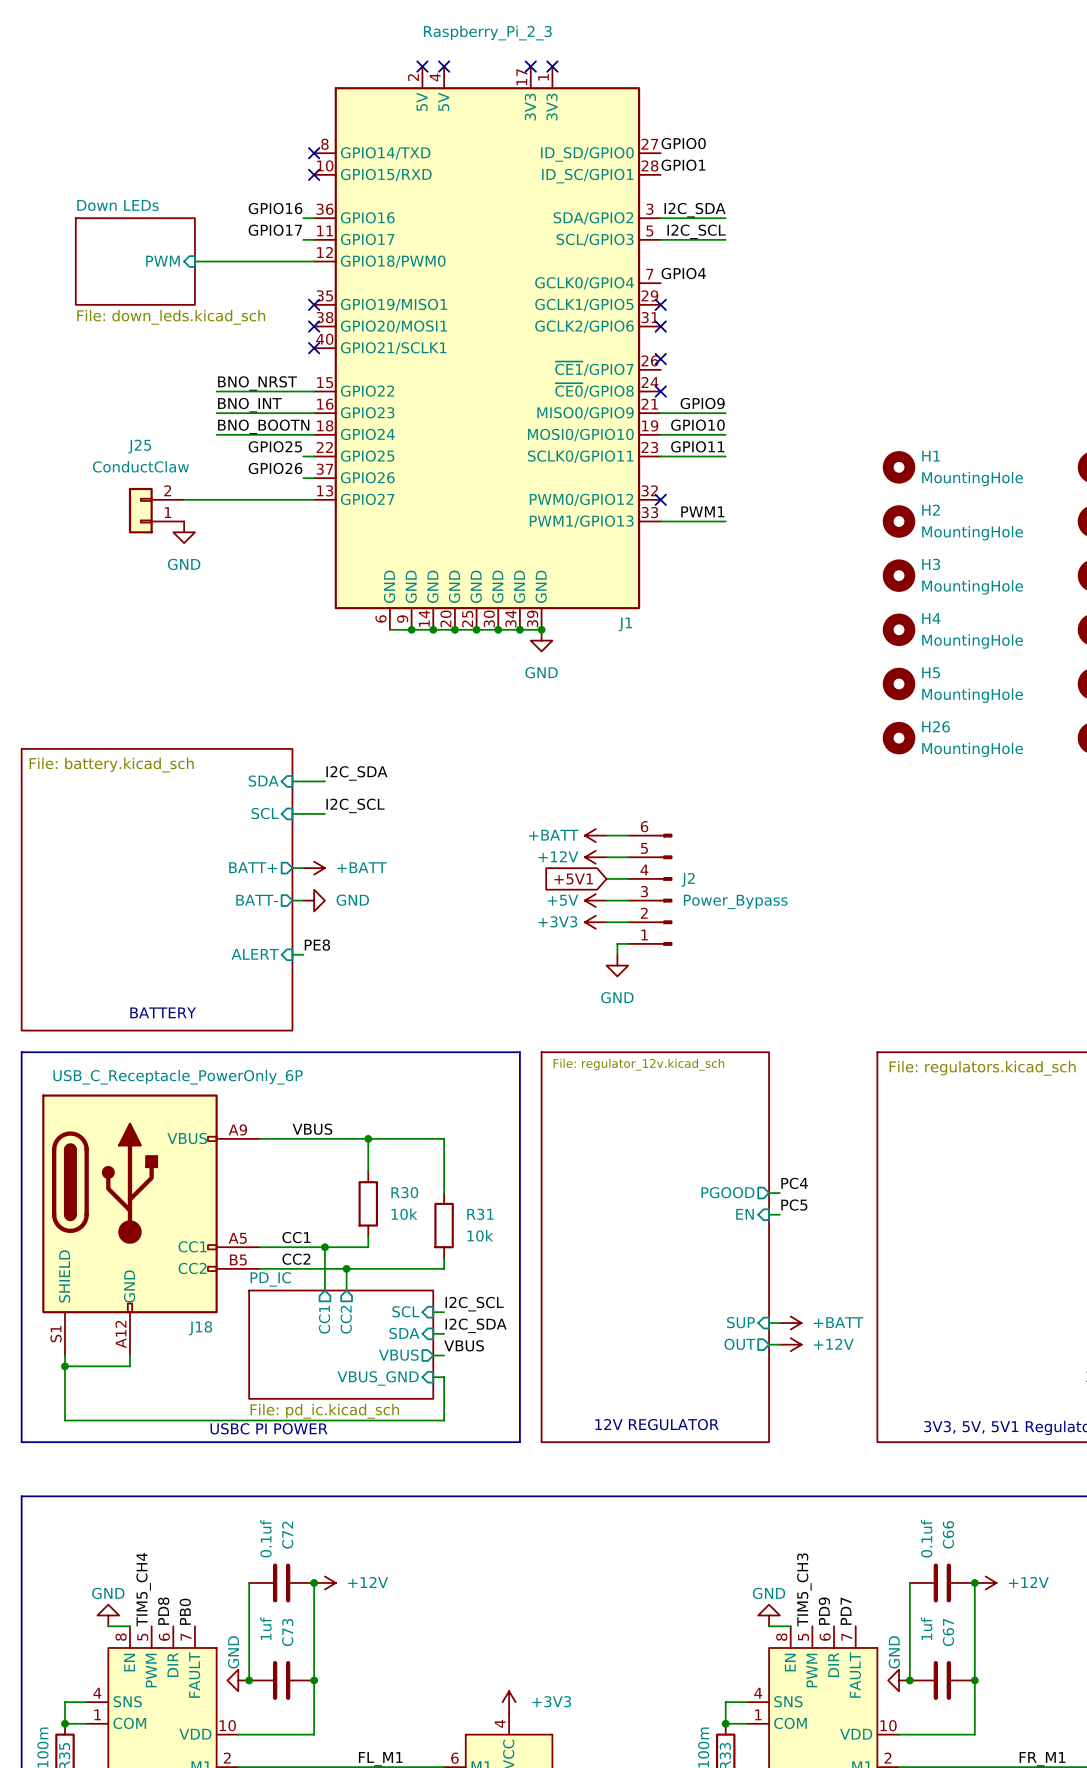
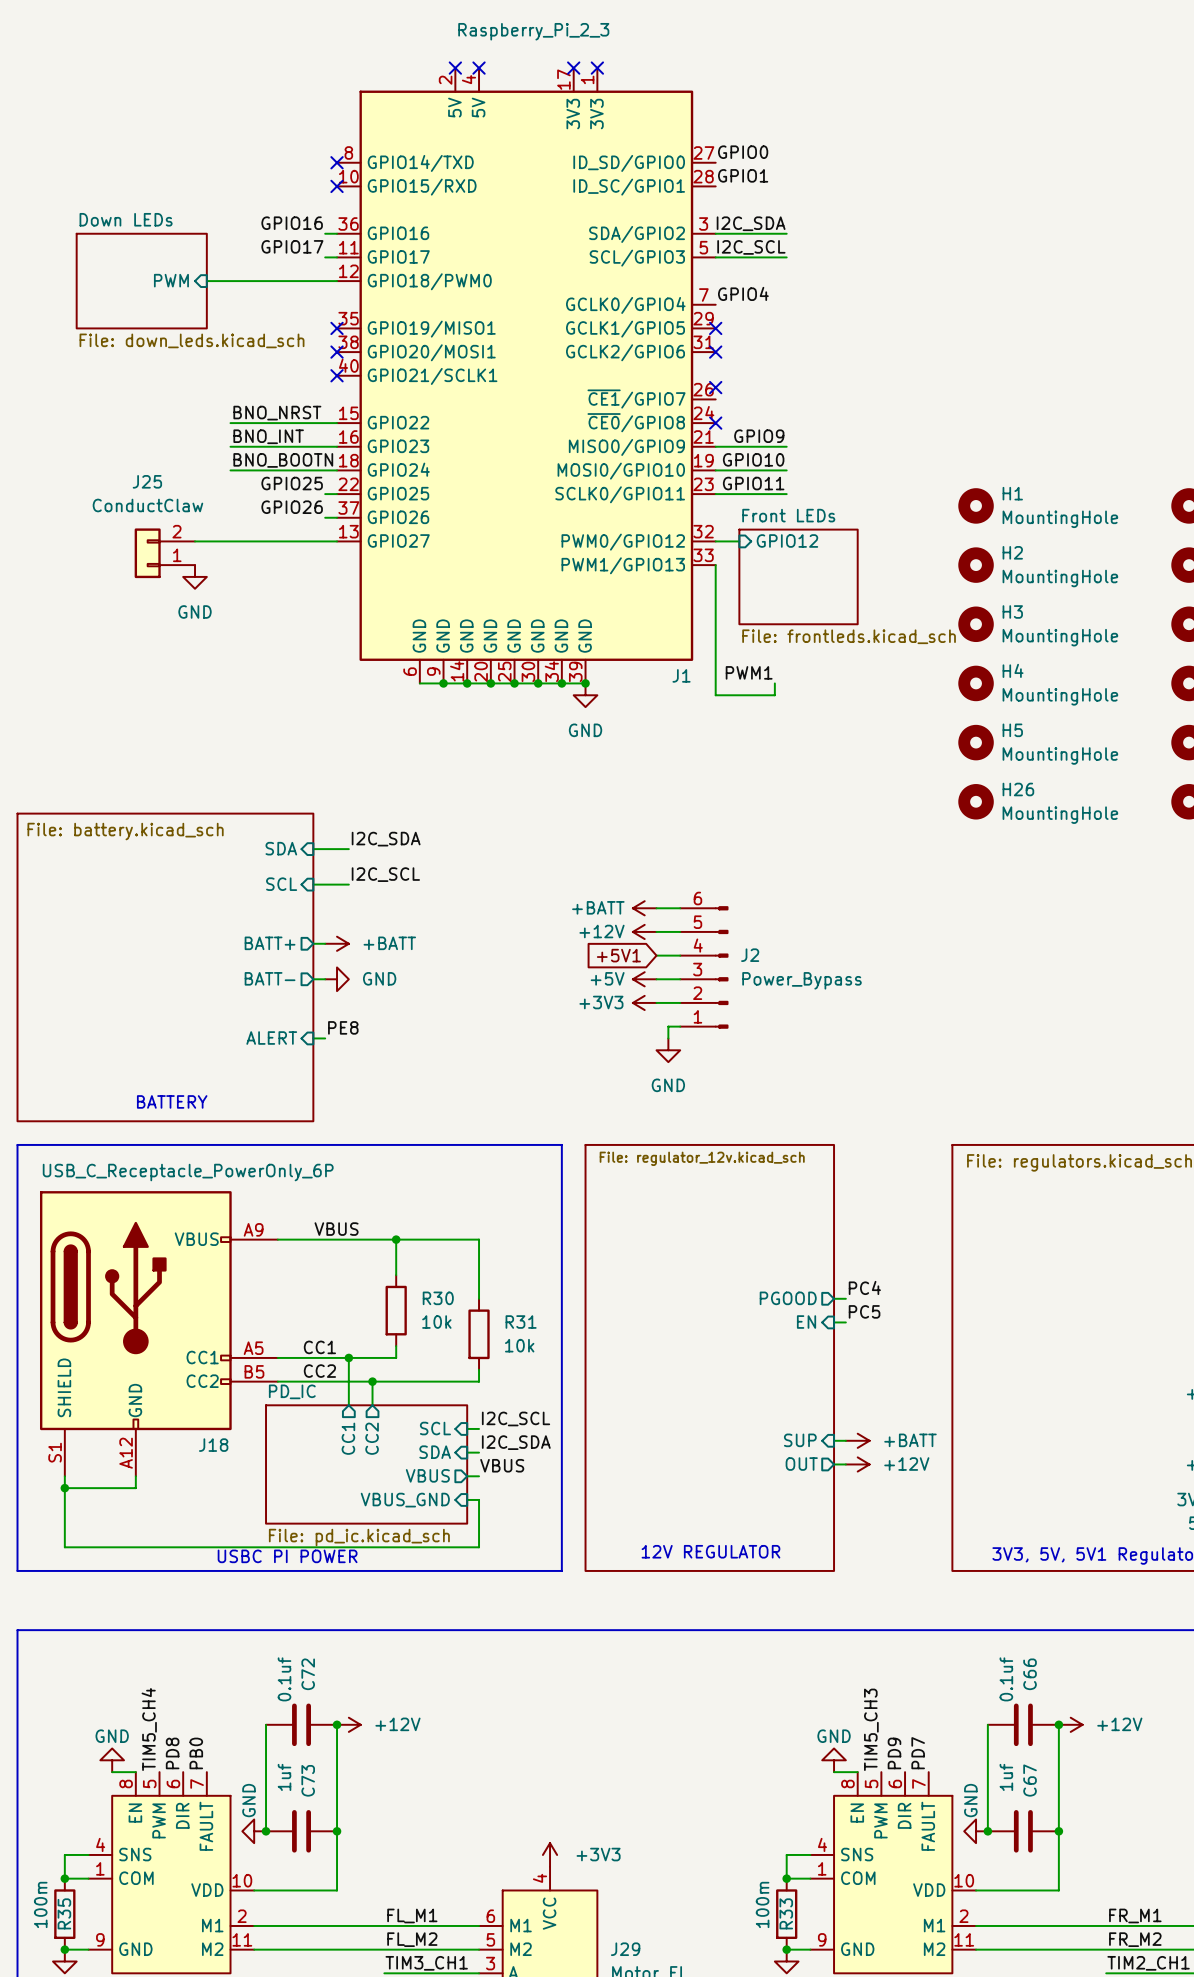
wire: none -> (715, 541) (739, 541)
no-connect mark: (660, 499) -> none
sheet pin: none -> GPIO12 (787, 540)
label position: PWM1 (702, 511) -> PWM1 (749, 672)
wire: (660, 521) (725, 521) -> (715, 565) (715, 695) (774, 695) (774, 683)
sheet Front LEDs: none -> File: frontleds.kicad_sch (798, 576)

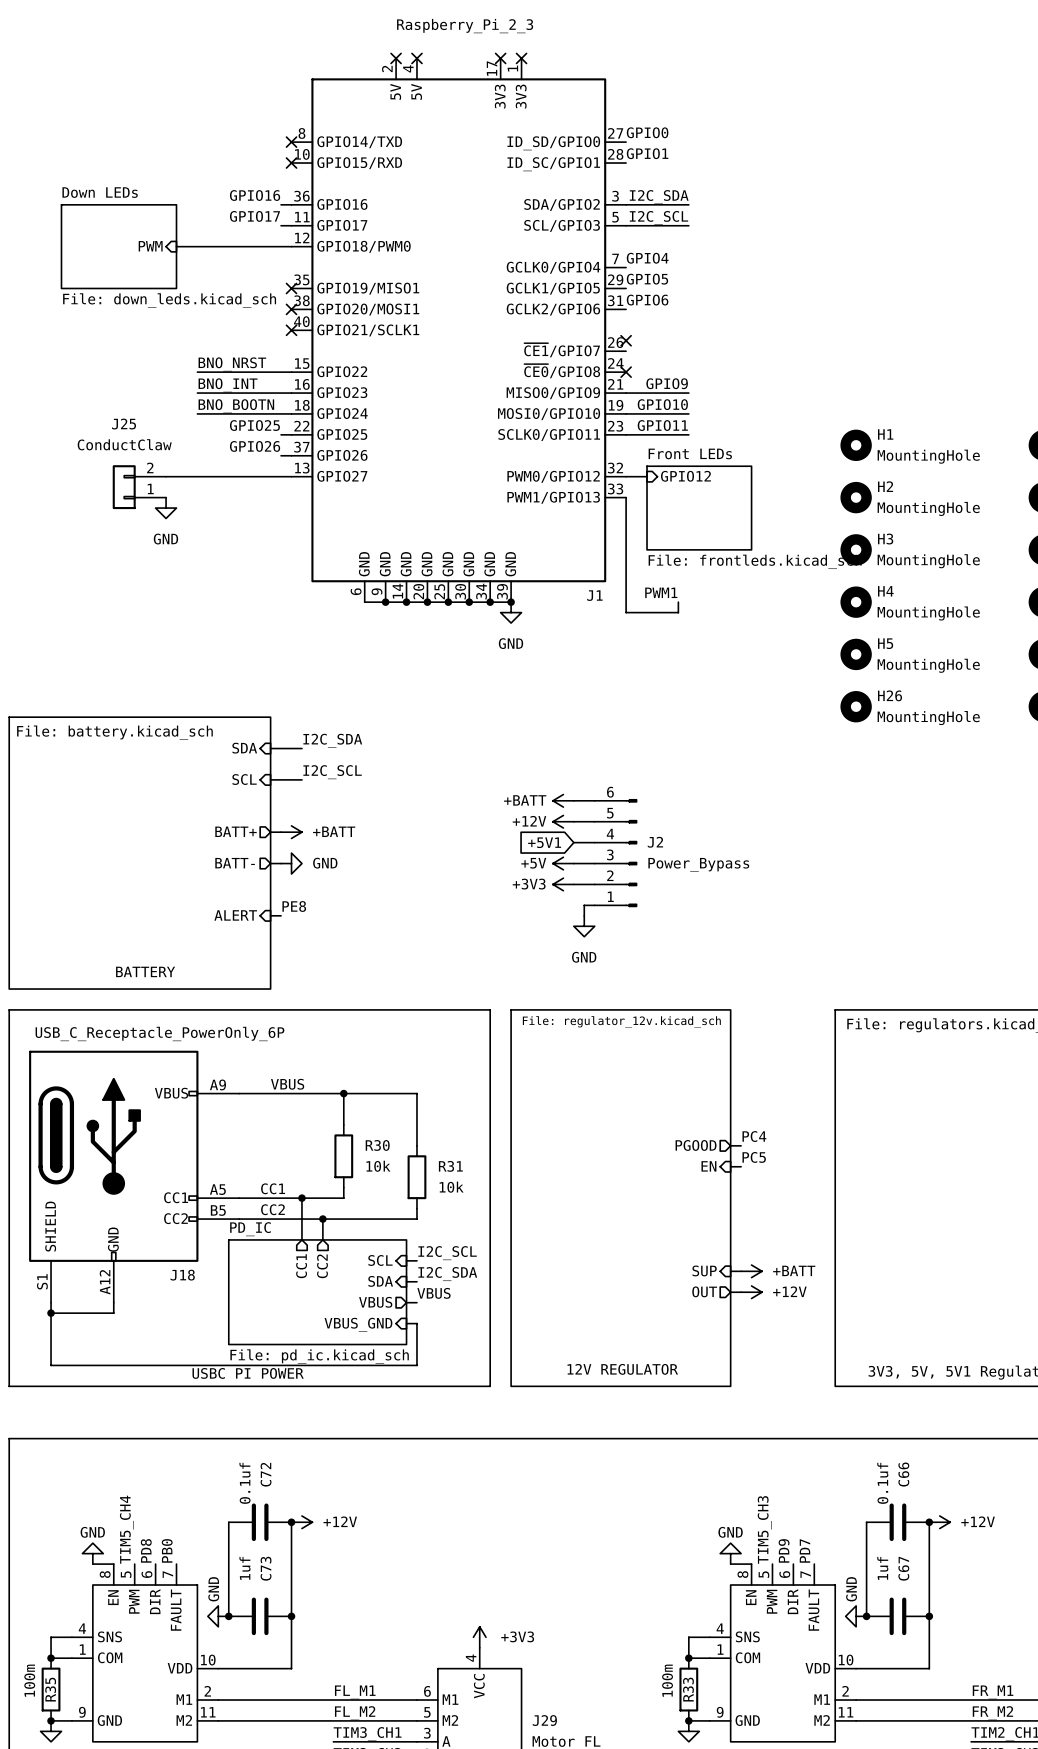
label: none -> GPIO5 (647, 279)
no-connect mark: (715, 328) -> none
label: none -> GPIO6 (647, 300)
no-connect mark: (715, 352) -> none

